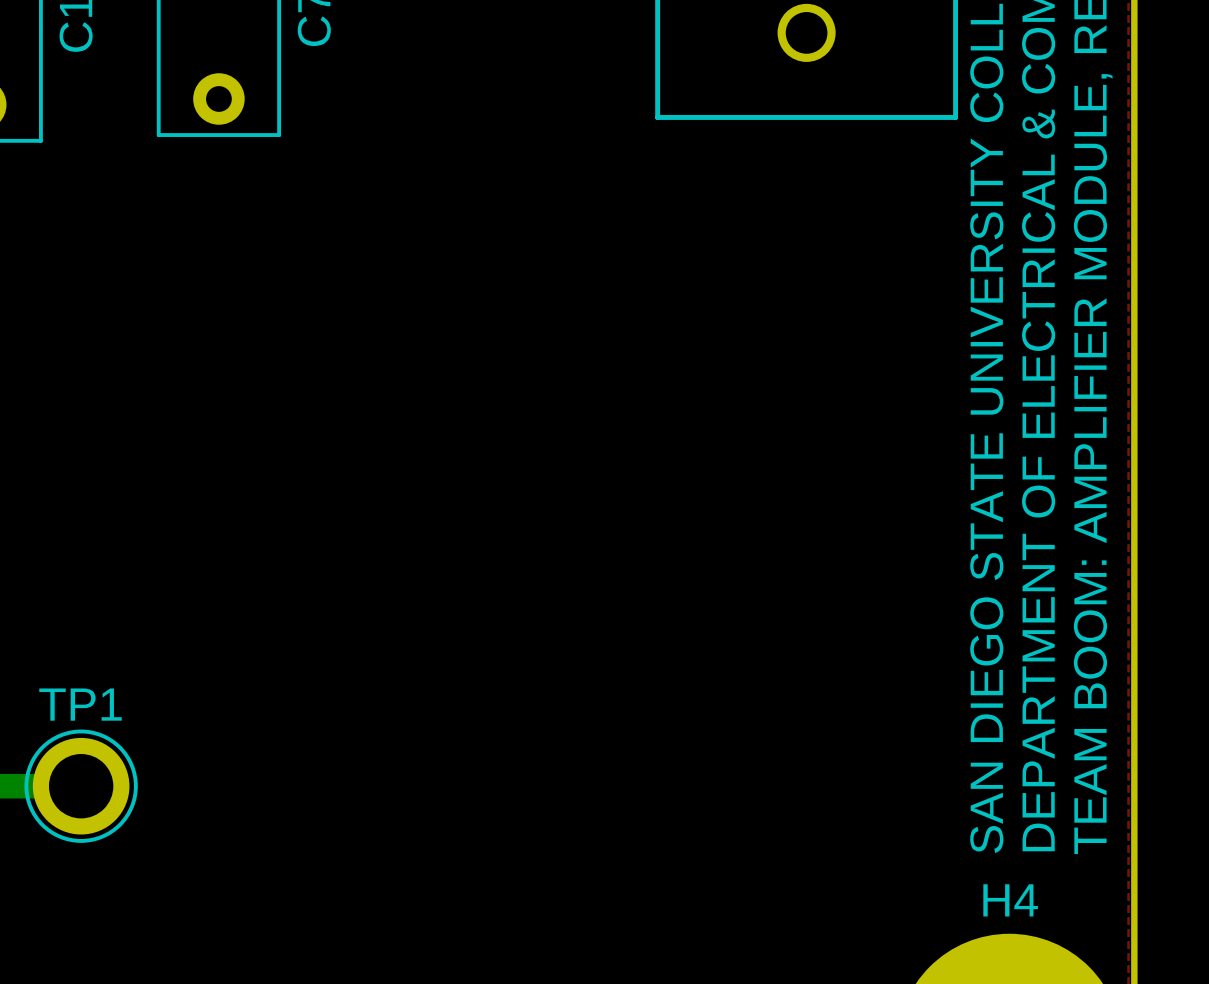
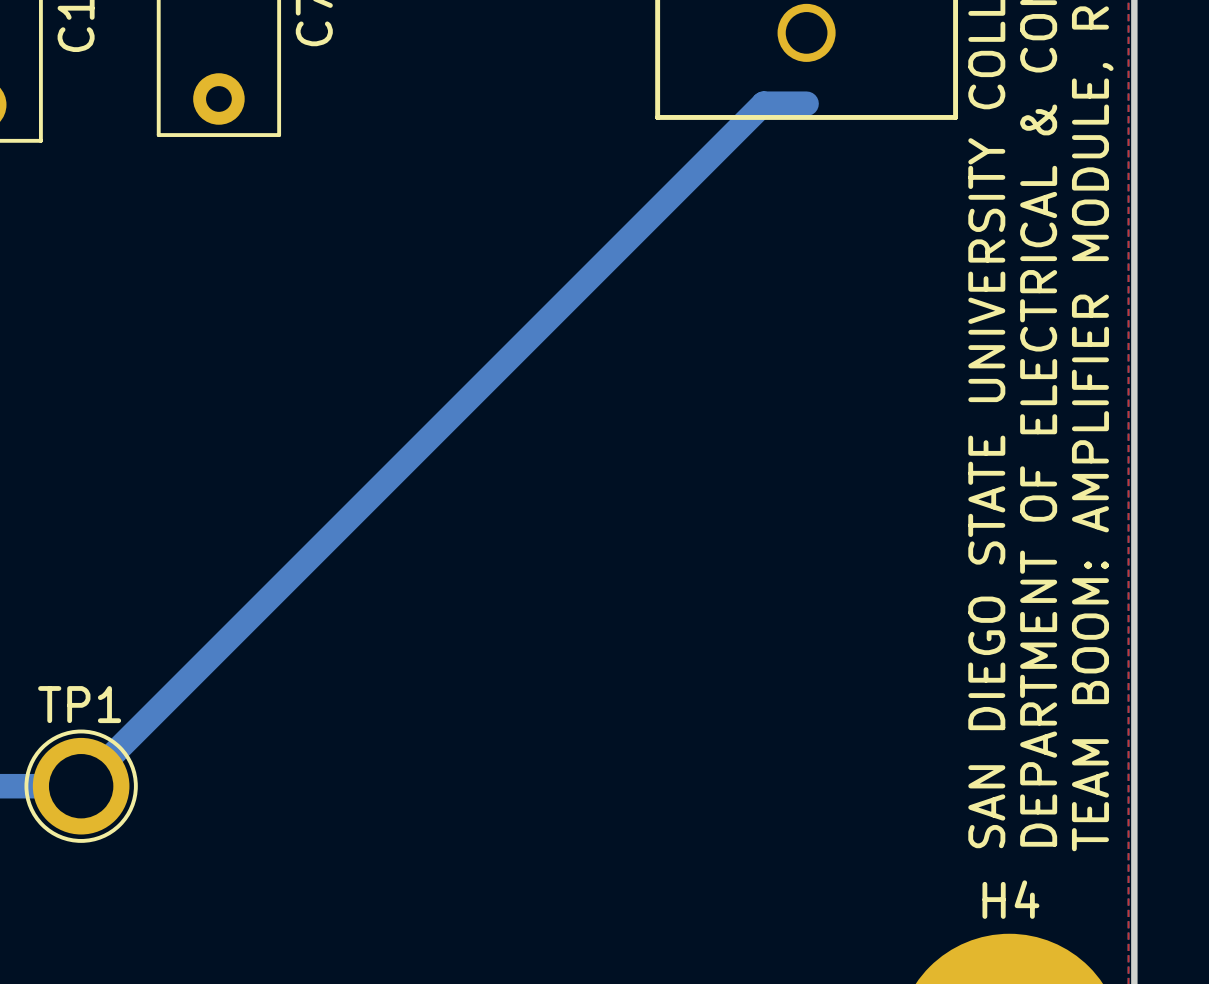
bottom track: none -> (806, 103) (763, 103) (81, 786)

